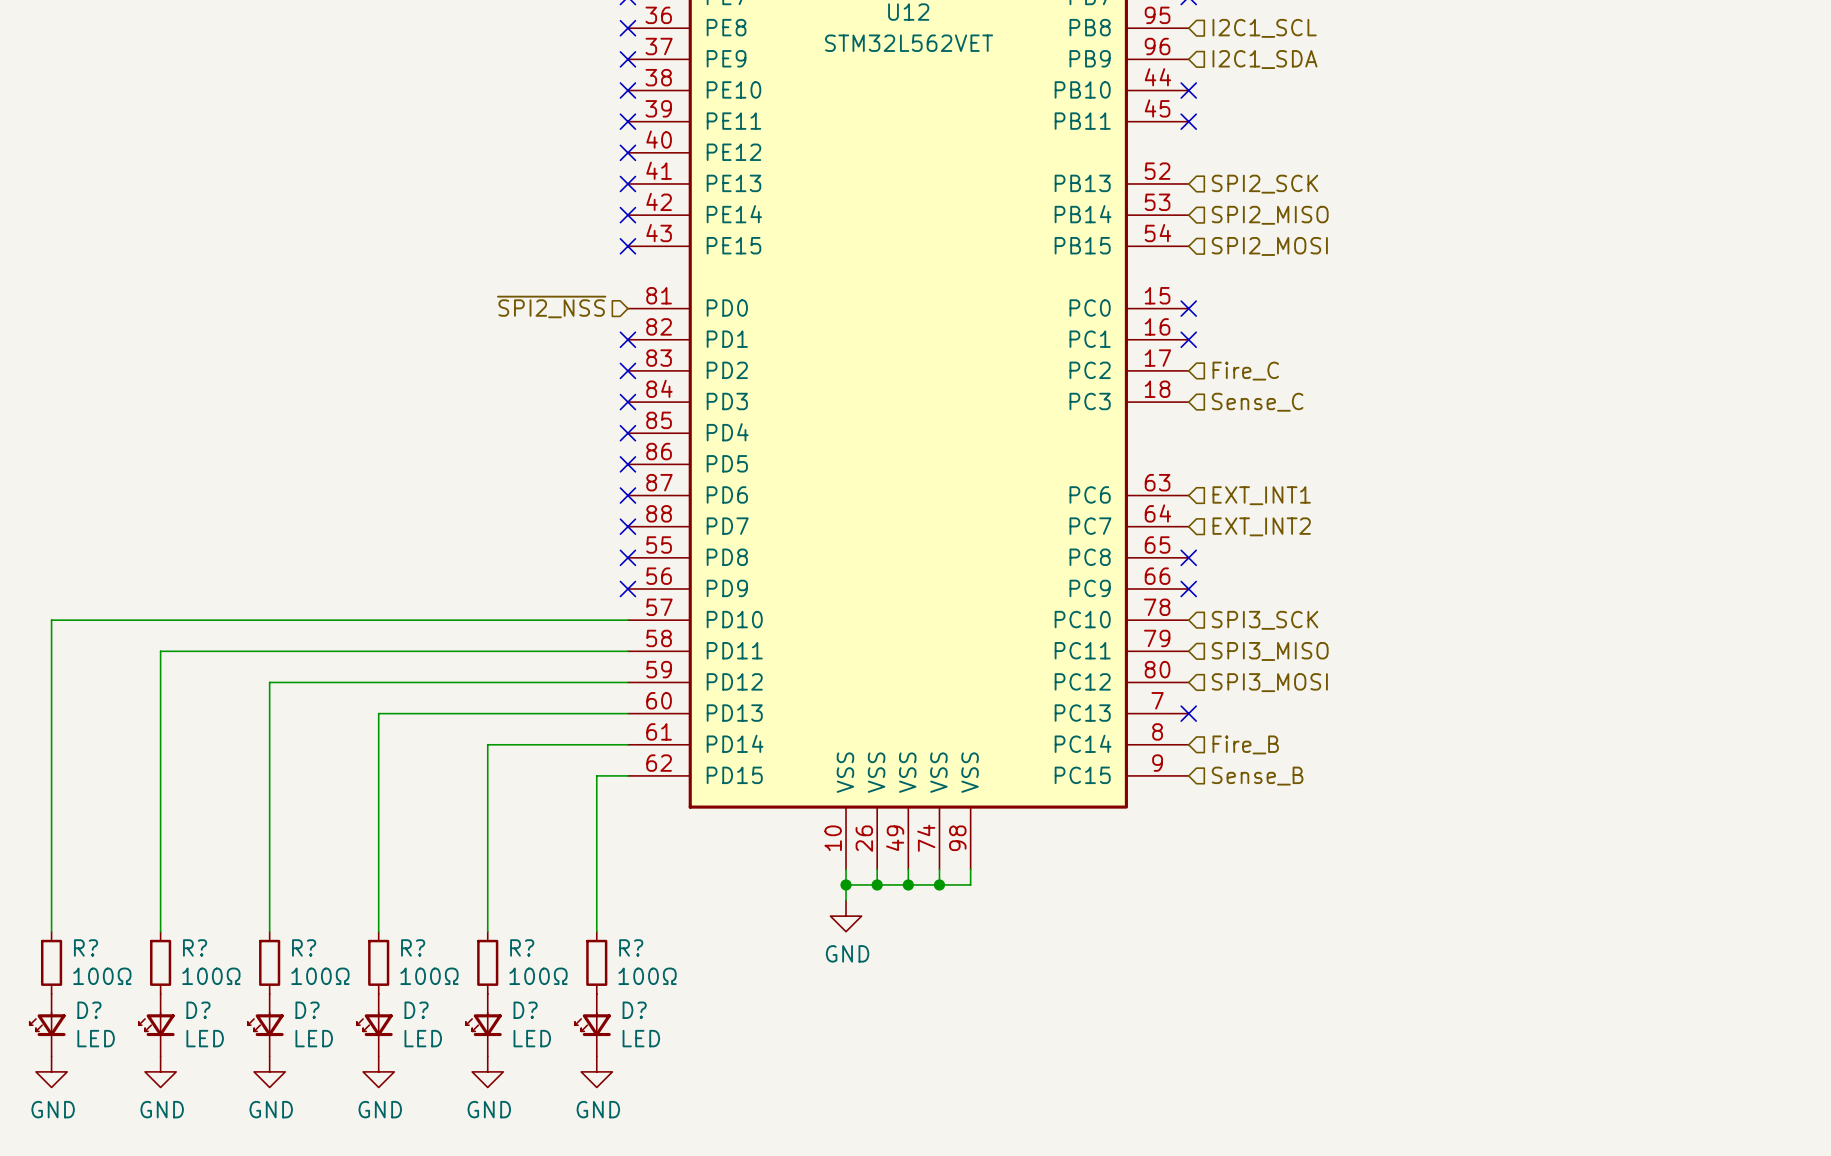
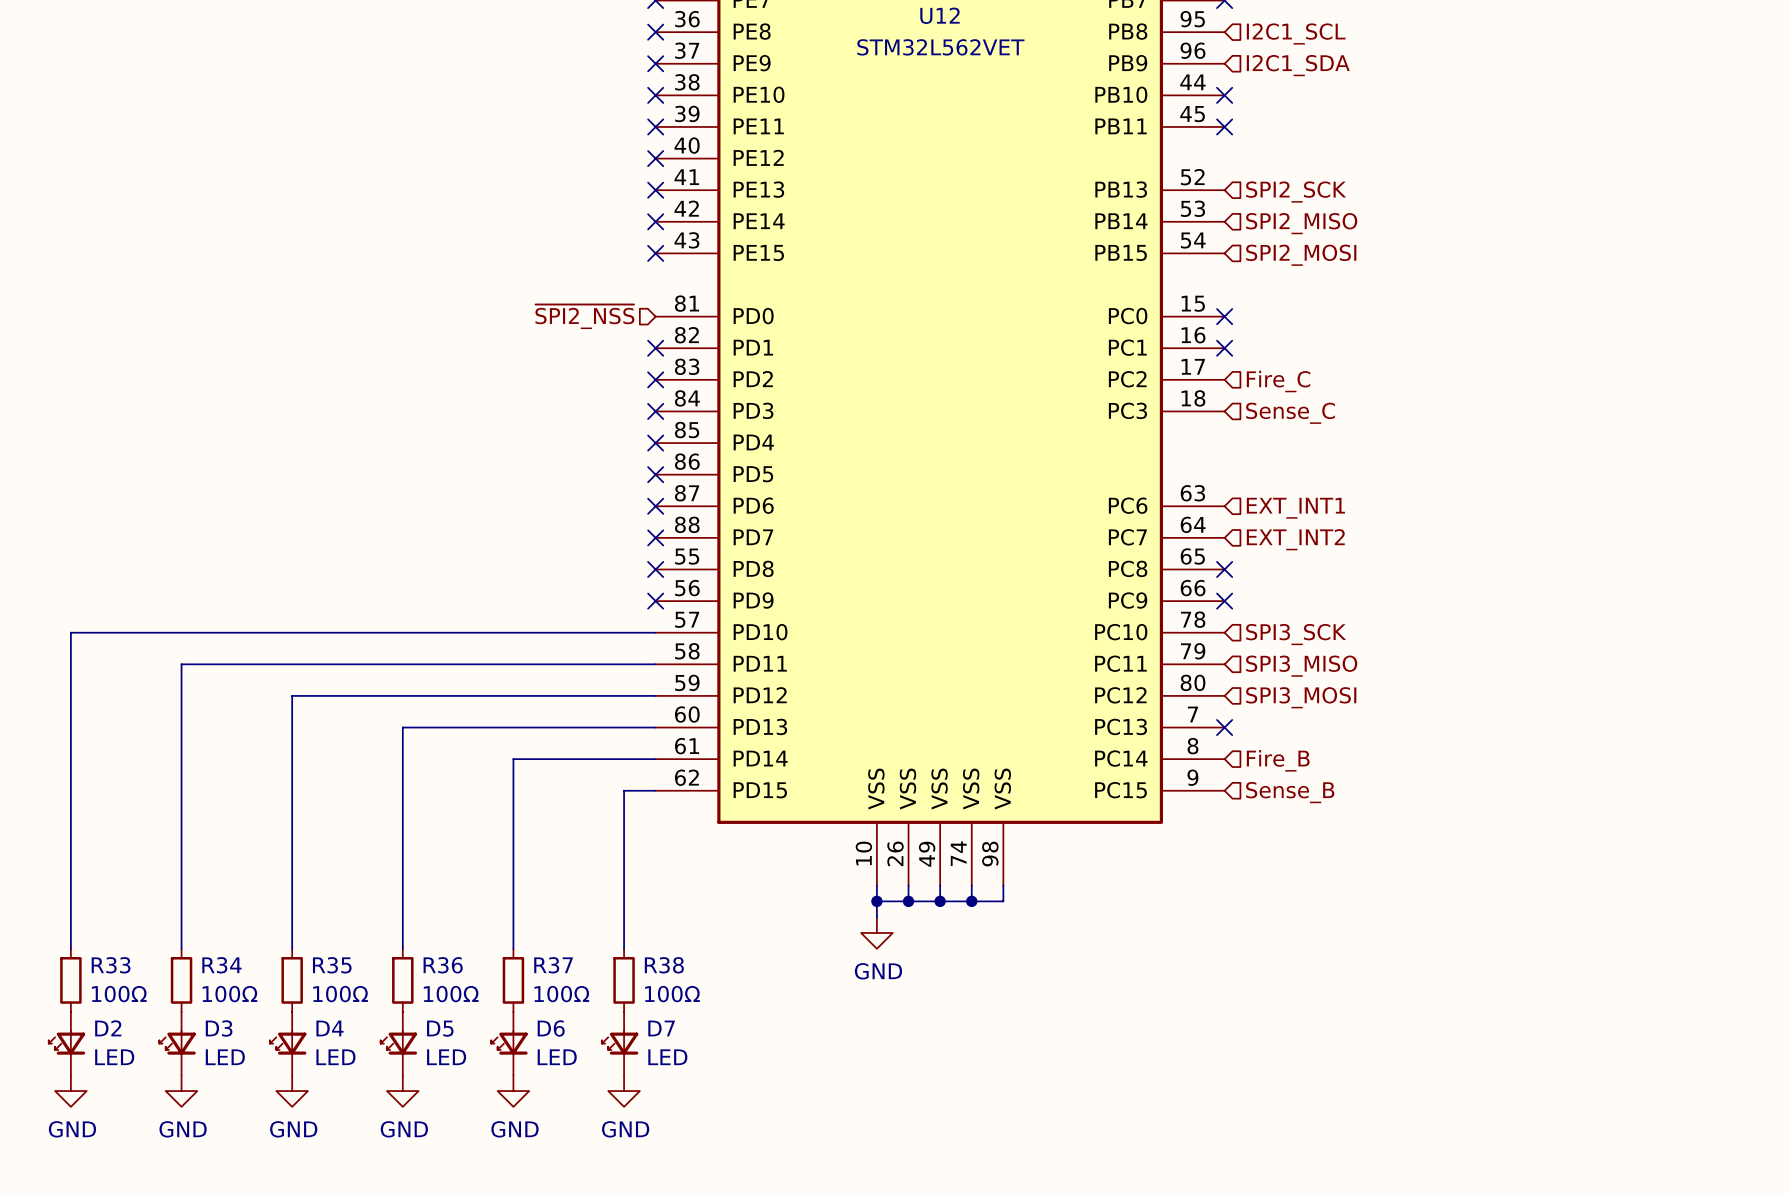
R? name: R? (86, 947) -> R33 (111, 965)
R? name: R? (195, 947) -> R34 (221, 965)
R? name: R? (304, 947) -> R35 (332, 965)
R? name: R? (413, 947) -> R36 (443, 965)
R? name: R? (522, 947) -> R37 (553, 965)
R? name: R? (631, 947) -> R38 (664, 965)
D? name: D? (89, 1010) -> D2 (108, 1028)
D? name: D? (198, 1010) -> D3 (219, 1028)
D? name: D? (307, 1010) -> D4 (329, 1028)
D? name: D? (416, 1010) -> D5 (440, 1028)
D? name: D? (525, 1010) -> D6 (551, 1028)
D? name: D? (634, 1010) -> D7 (661, 1028)

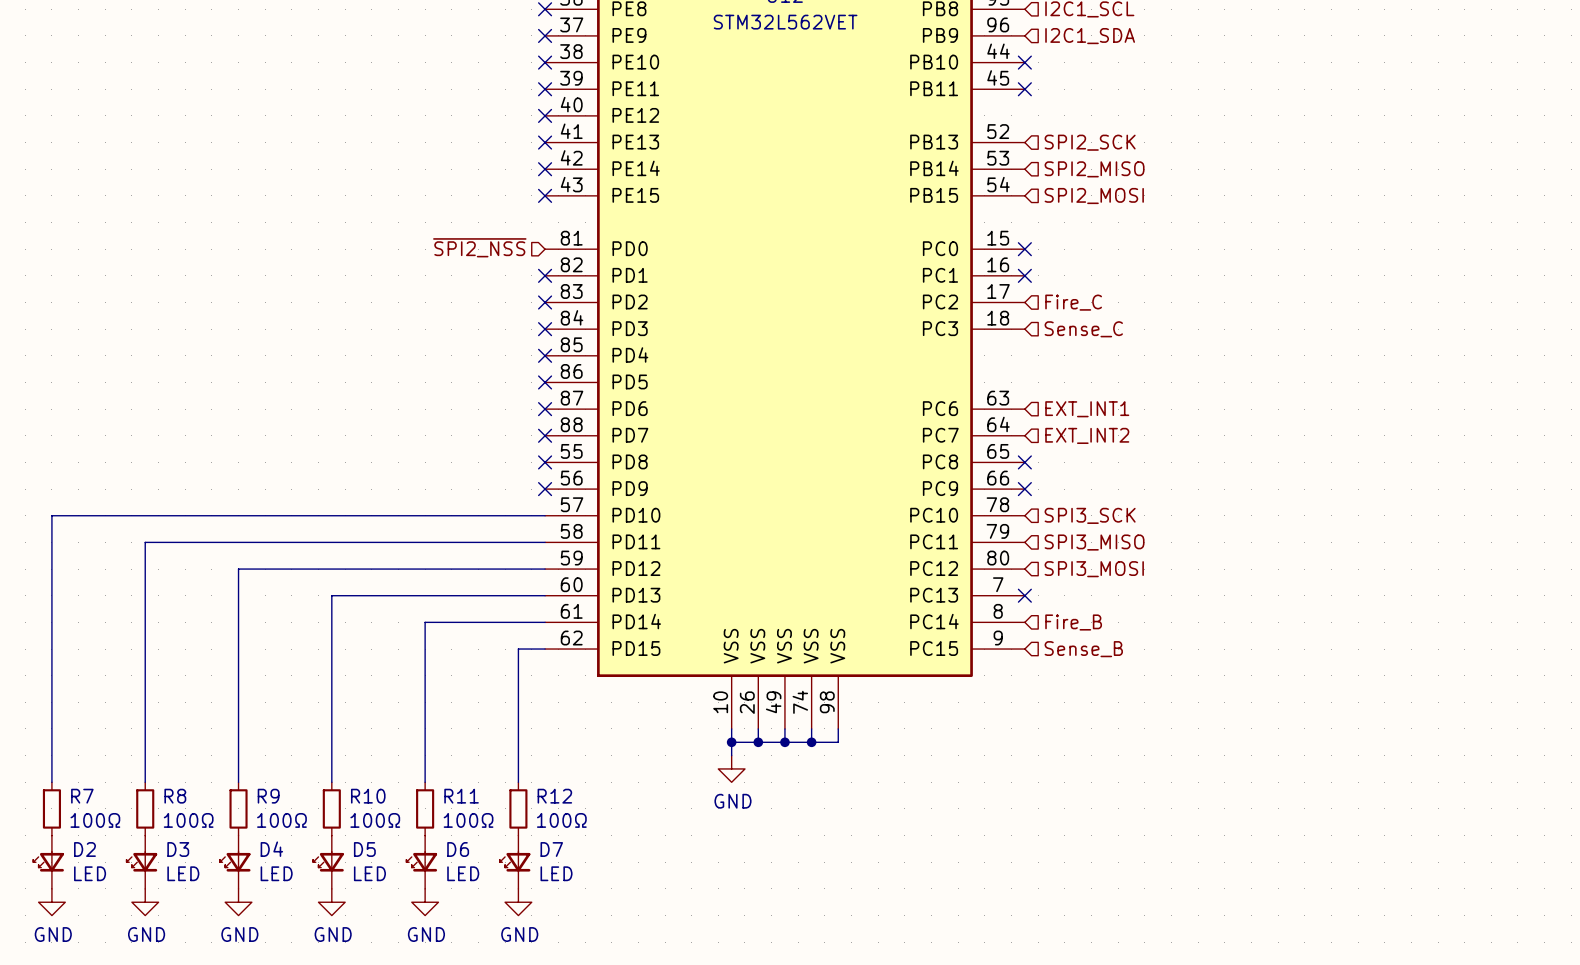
R33 name: R33 (111, 965) -> R7 (82, 796)
R34 name: R34 (221, 965) -> R8 (175, 796)
R35 name: R35 (332, 965) -> R9 (268, 796)
R36 name: R36 (443, 965) -> R10 (368, 796)
R37 name: R37 (553, 965) -> R11 (461, 796)
R38 name: R38 (664, 965) -> R12 (554, 796)

